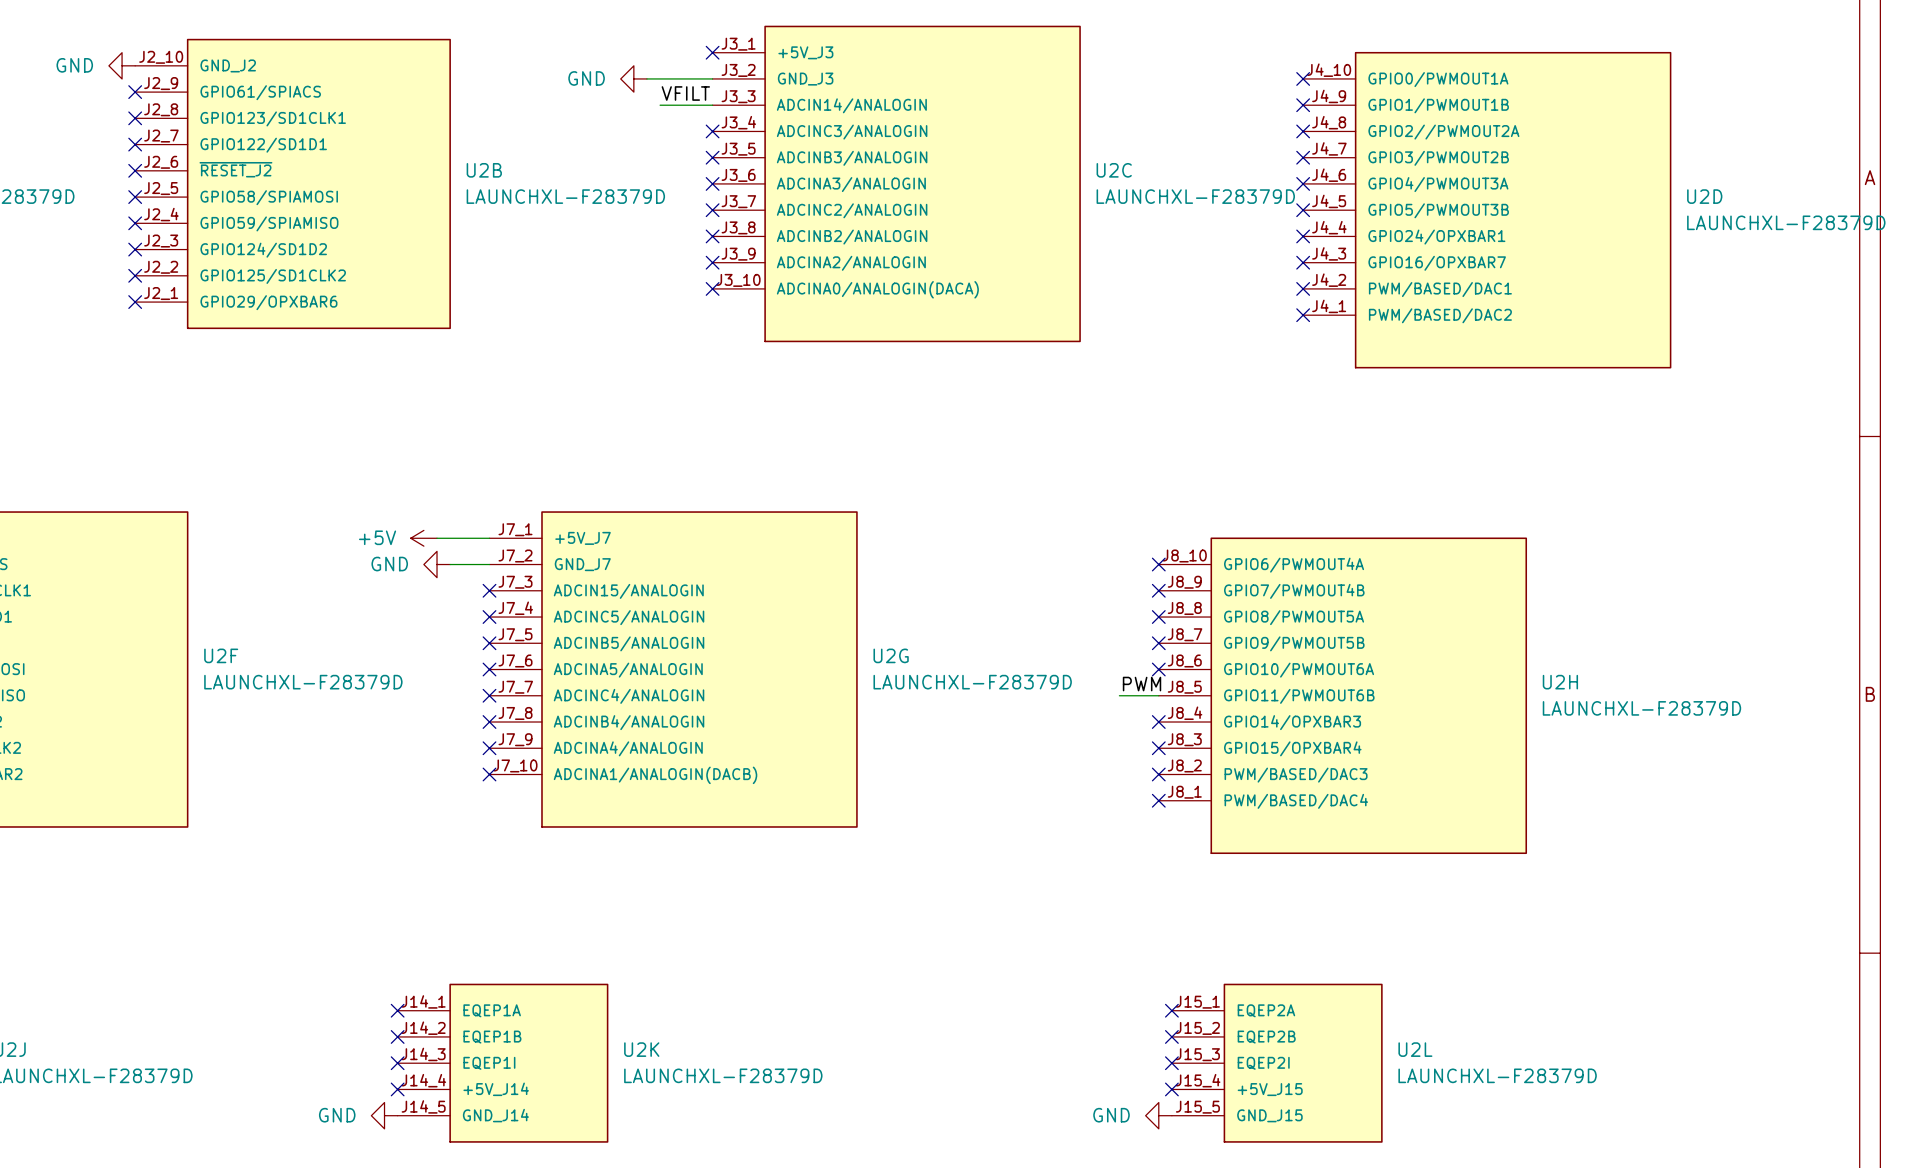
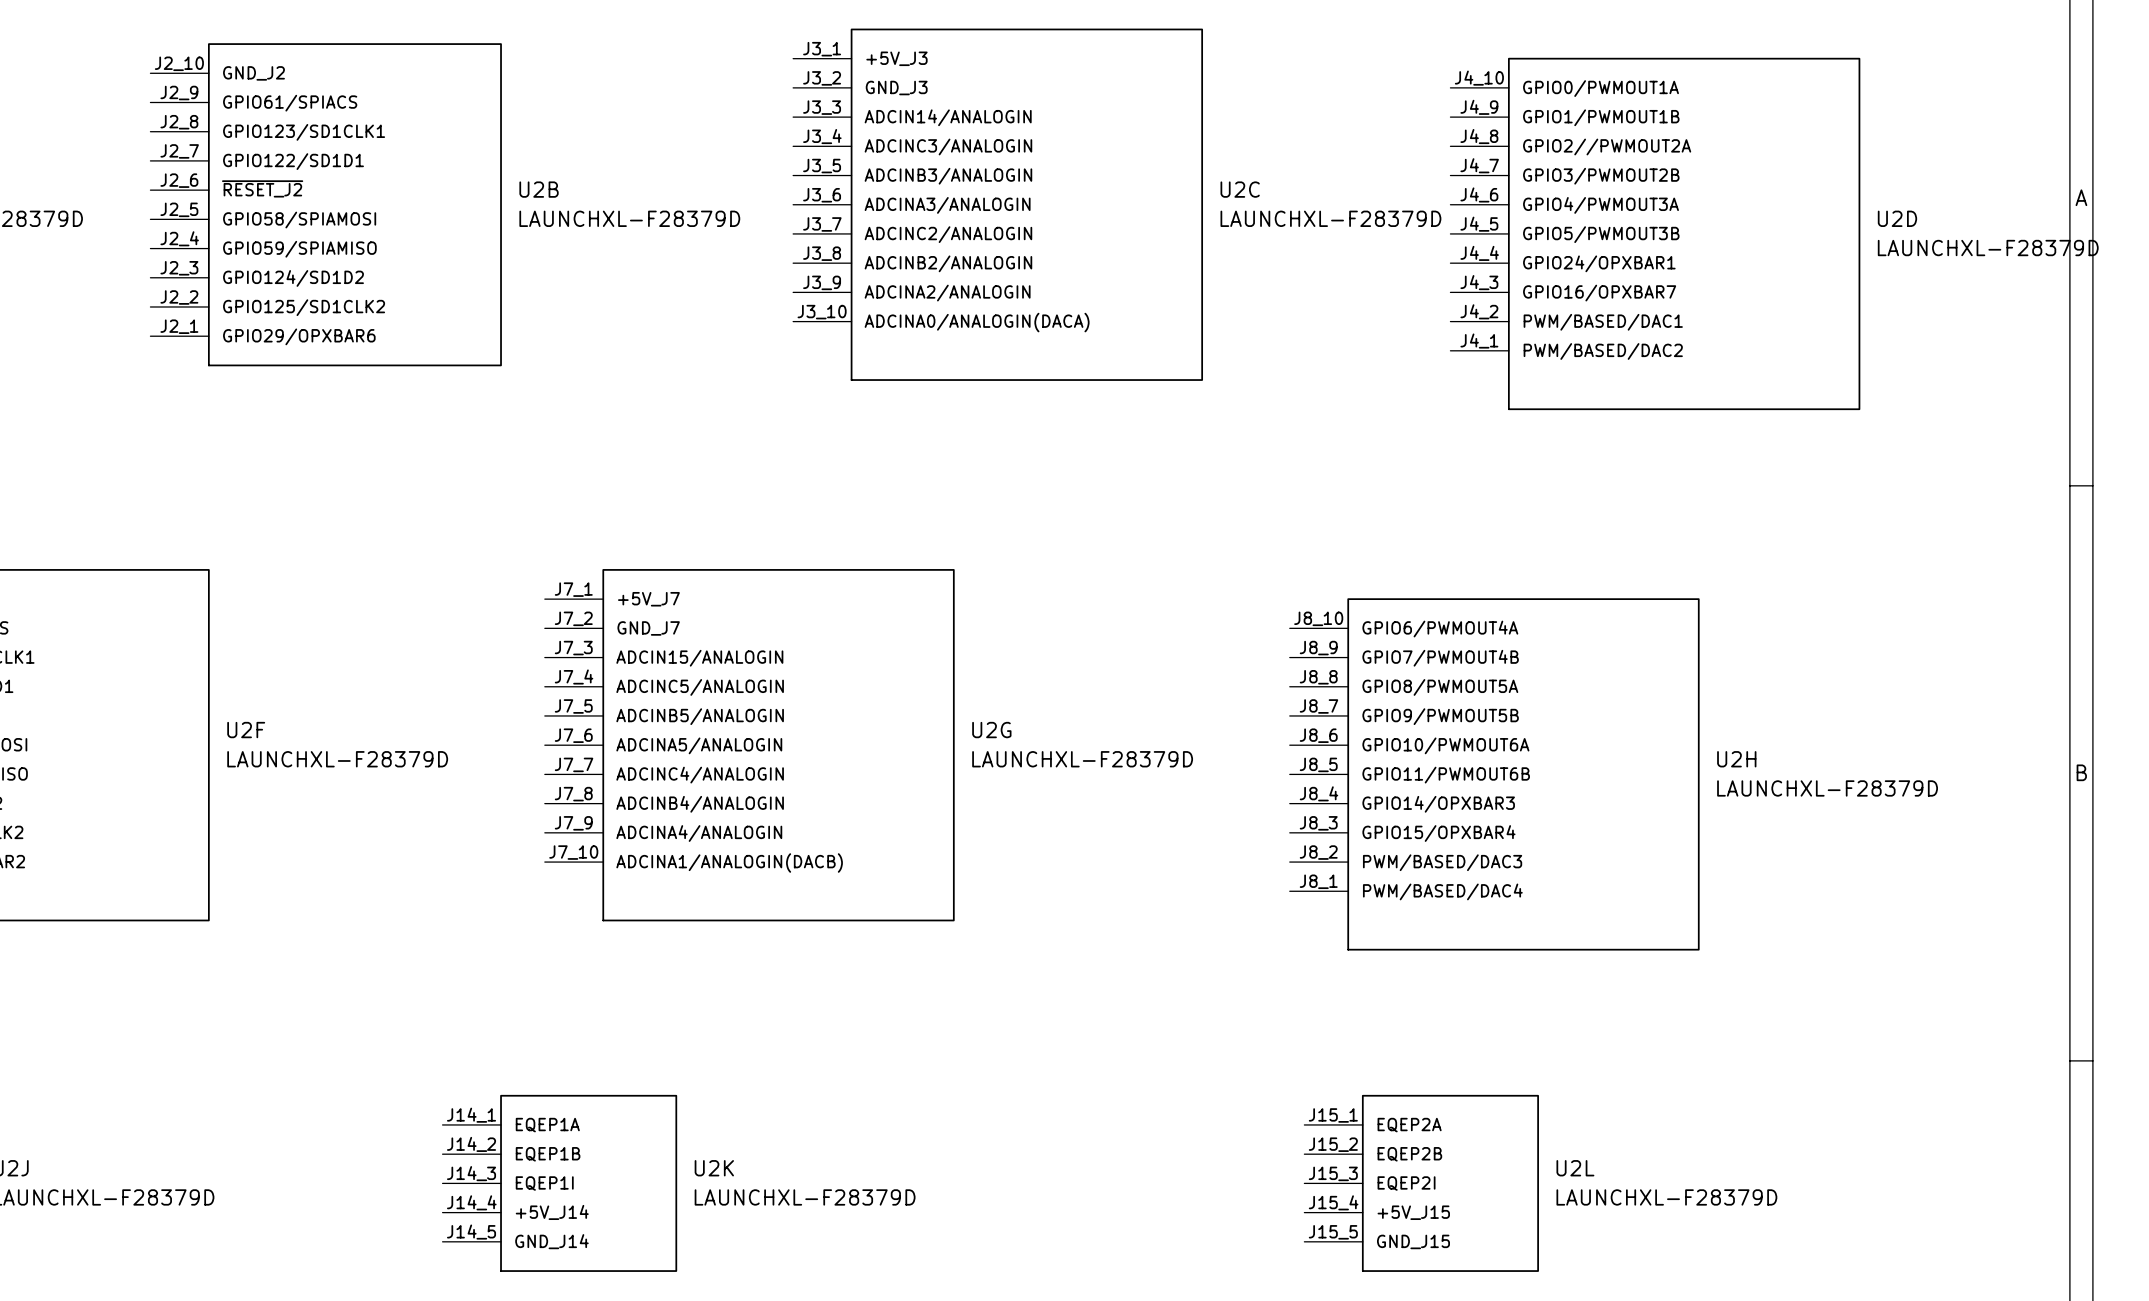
no-connect mark: (712, 52) -> none
power symbol: GND (122, 65) -> none
power symbol: GND (633, 78) -> none
wire: (646, 78) (712, 78) -> none
no-connect mark: (1303, 78) -> none
no-connect mark: (135, 92) -> none
label: VFILT (685, 93) -> none
wire: (660, 105) (712, 105) -> none
no-connect mark: (1303, 105) -> none
no-connect mark: (135, 118) -> none
no-connect mark: (712, 131) -> none
no-connect mark: (1303, 131) -> none
no-connect mark: (135, 144) -> none
no-connect mark: (712, 157) -> none
no-connect mark: (1303, 157) -> none
no-connect mark: (135, 170) -> none
no-connect mark: (712, 183) -> none
no-connect mark: (1303, 183) -> none
no-connect mark: (135, 197) -> none
no-connect mark: (712, 210) -> none
no-connect mark: (1303, 210) -> none
no-connect mark: (135, 223) -> none
no-connect mark: (712, 236) -> none
no-connect mark: (1303, 236) -> none
no-connect mark: (135, 249) -> none
no-connect mark: (712, 262) -> none
no-connect mark: (1303, 262) -> none
no-connect mark: (135, 275) -> none
no-connect mark: (712, 288) -> none
no-connect mark: (1303, 288) -> none
no-connect mark: (135, 302) -> none
no-connect mark: (1303, 315) -> none
power symbol: +5V (423, 538) -> none
wire: (437, 538) (489, 538) -> none
power symbol: GND (437, 564) -> none
wire: (450, 564) (489, 564) -> none
no-connect mark: (1158, 564) -> none
no-connect mark: (489, 590) -> none
no-connect mark: (1158, 590) -> none
no-connect mark: (489, 617) -> none
no-connect mark: (1158, 617) -> none
no-connect mark: (489, 643) -> none
no-connect mark: (1158, 643) -> none
no-connect mark: (489, 669) -> none
no-connect mark: (1158, 669) -> none
label: PWM (1142, 684) -> none
no-connect mark: (489, 695) -> none
wire: (1119, 695) (1158, 695) -> none
no-connect mark: (489, 722) -> none
no-connect mark: (1158, 722) -> none
no-connect mark: (489, 748) -> none
no-connect mark: (1158, 748) -> none
no-connect mark: (489, 774) -> none
no-connect mark: (1158, 774) -> none
no-connect mark: (1158, 800) -> none
no-connect mark: (397, 1010) -> none
no-connect mark: (1171, 1010) -> none
no-connect mark: (397, 1036) -> none
no-connect mark: (1171, 1036) -> none
no-connect mark: (397, 1063) -> none
no-connect mark: (1171, 1063) -> none
no-connect mark: (397, 1089) -> none
no-connect mark: (1171, 1089) -> none
power symbol: GND (384, 1115) -> none
power symbol: GND (1158, 1115) -> none

